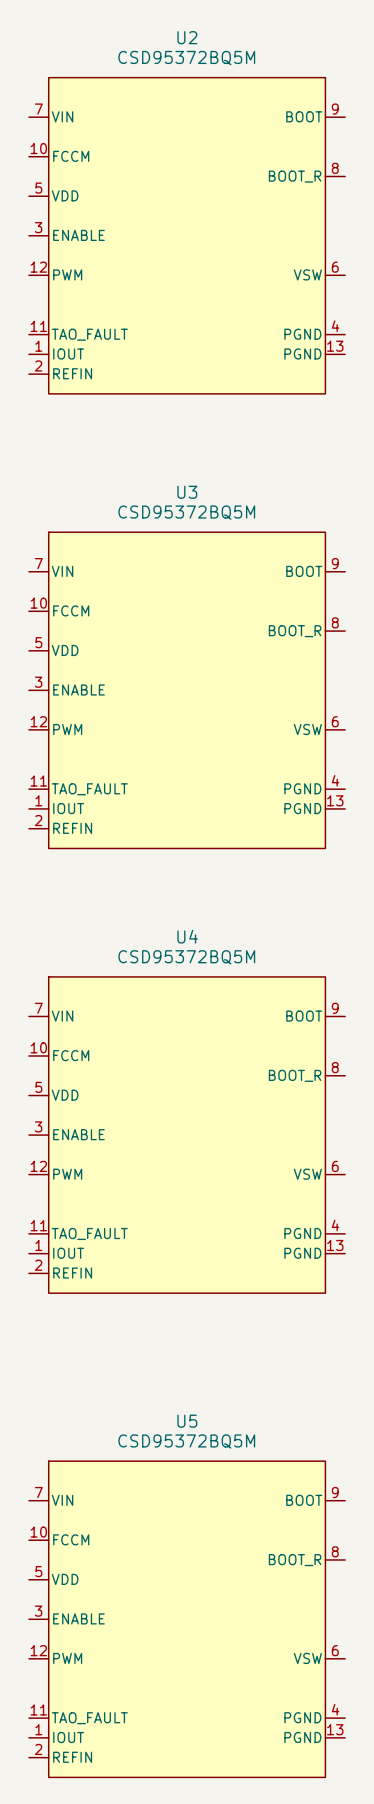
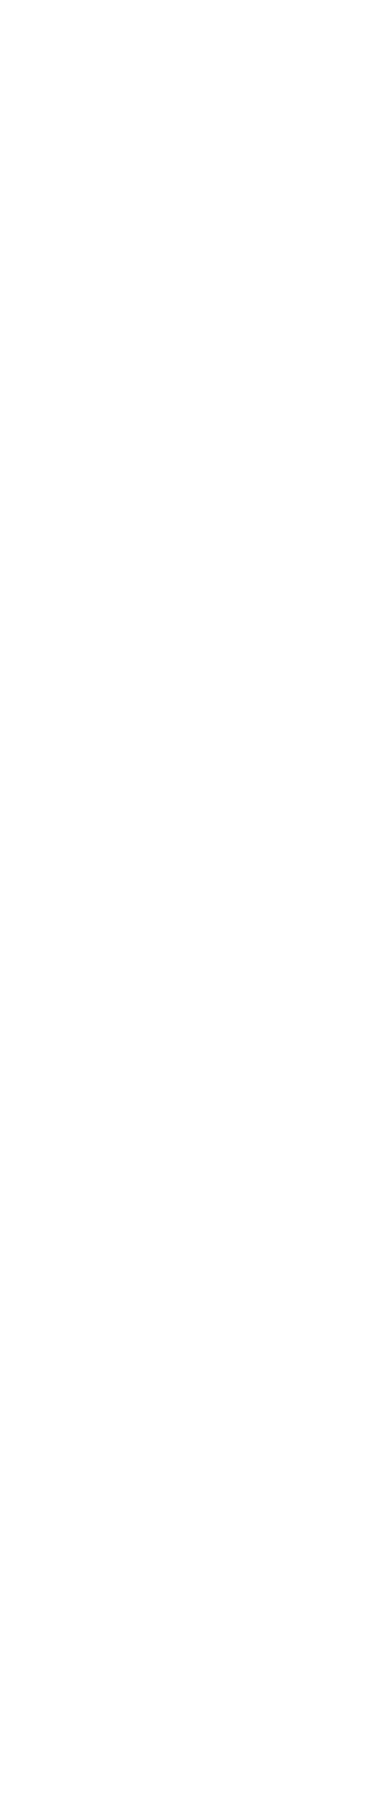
U2: CSD95372BQ5M (187, 235) -> none
U3: CSD95372BQ5M (187, 690) -> none
U4: CSD95372BQ5M (187, 1135) -> none
U5: CSD95372BQ5M (187, 1619) -> none

